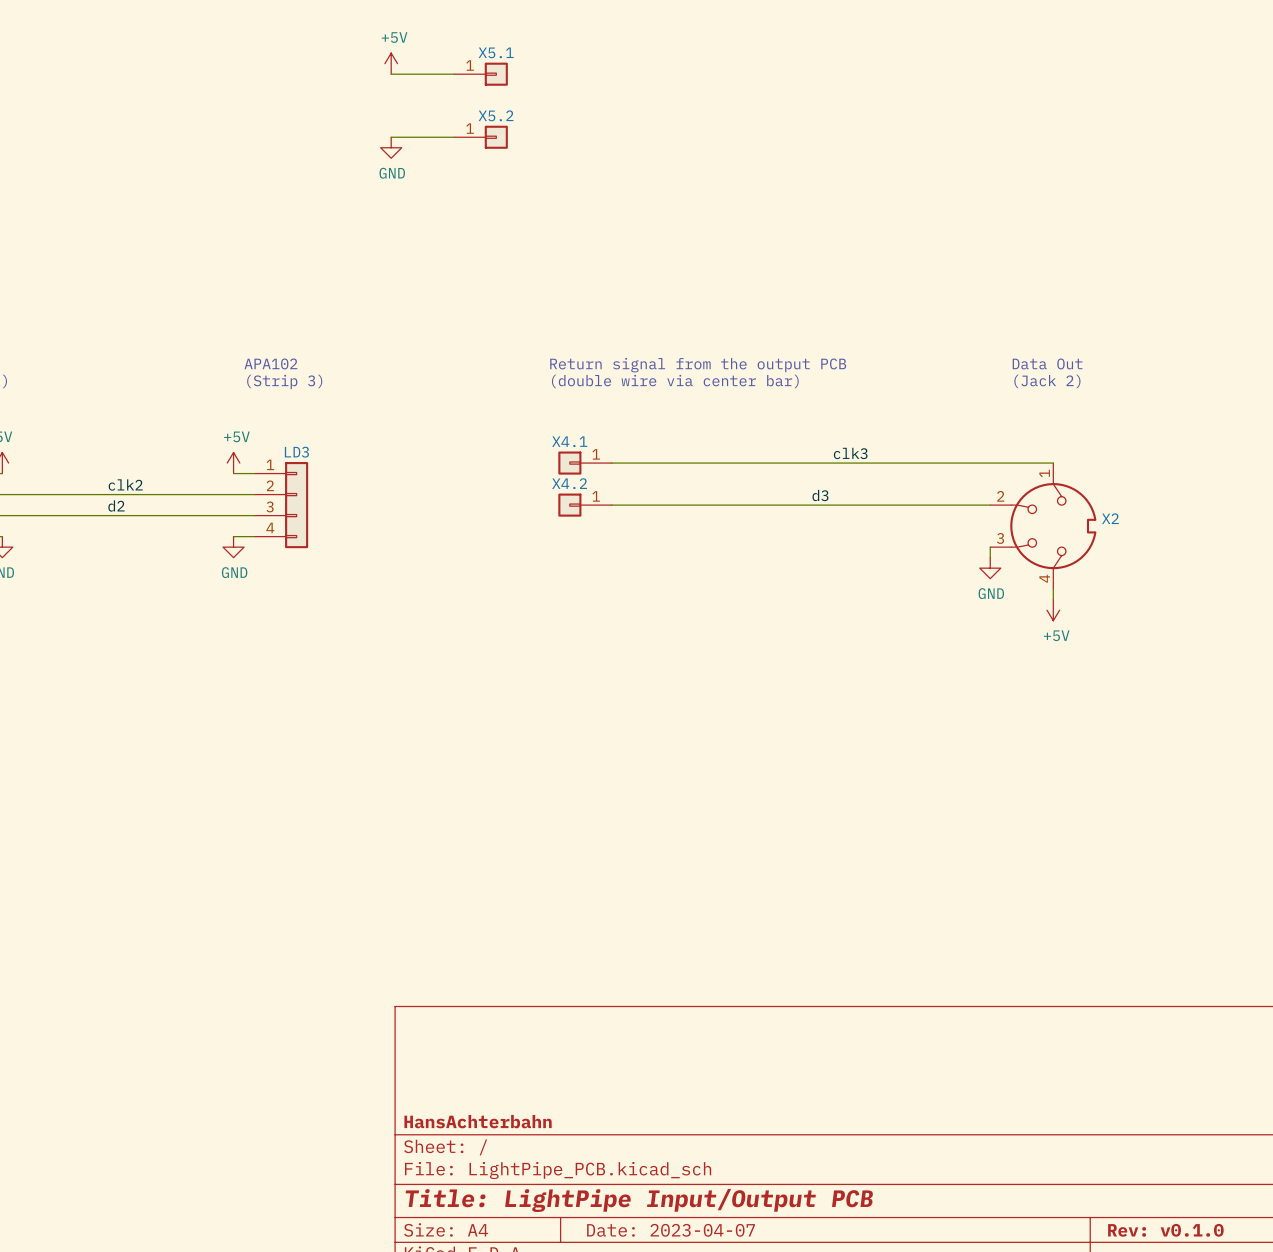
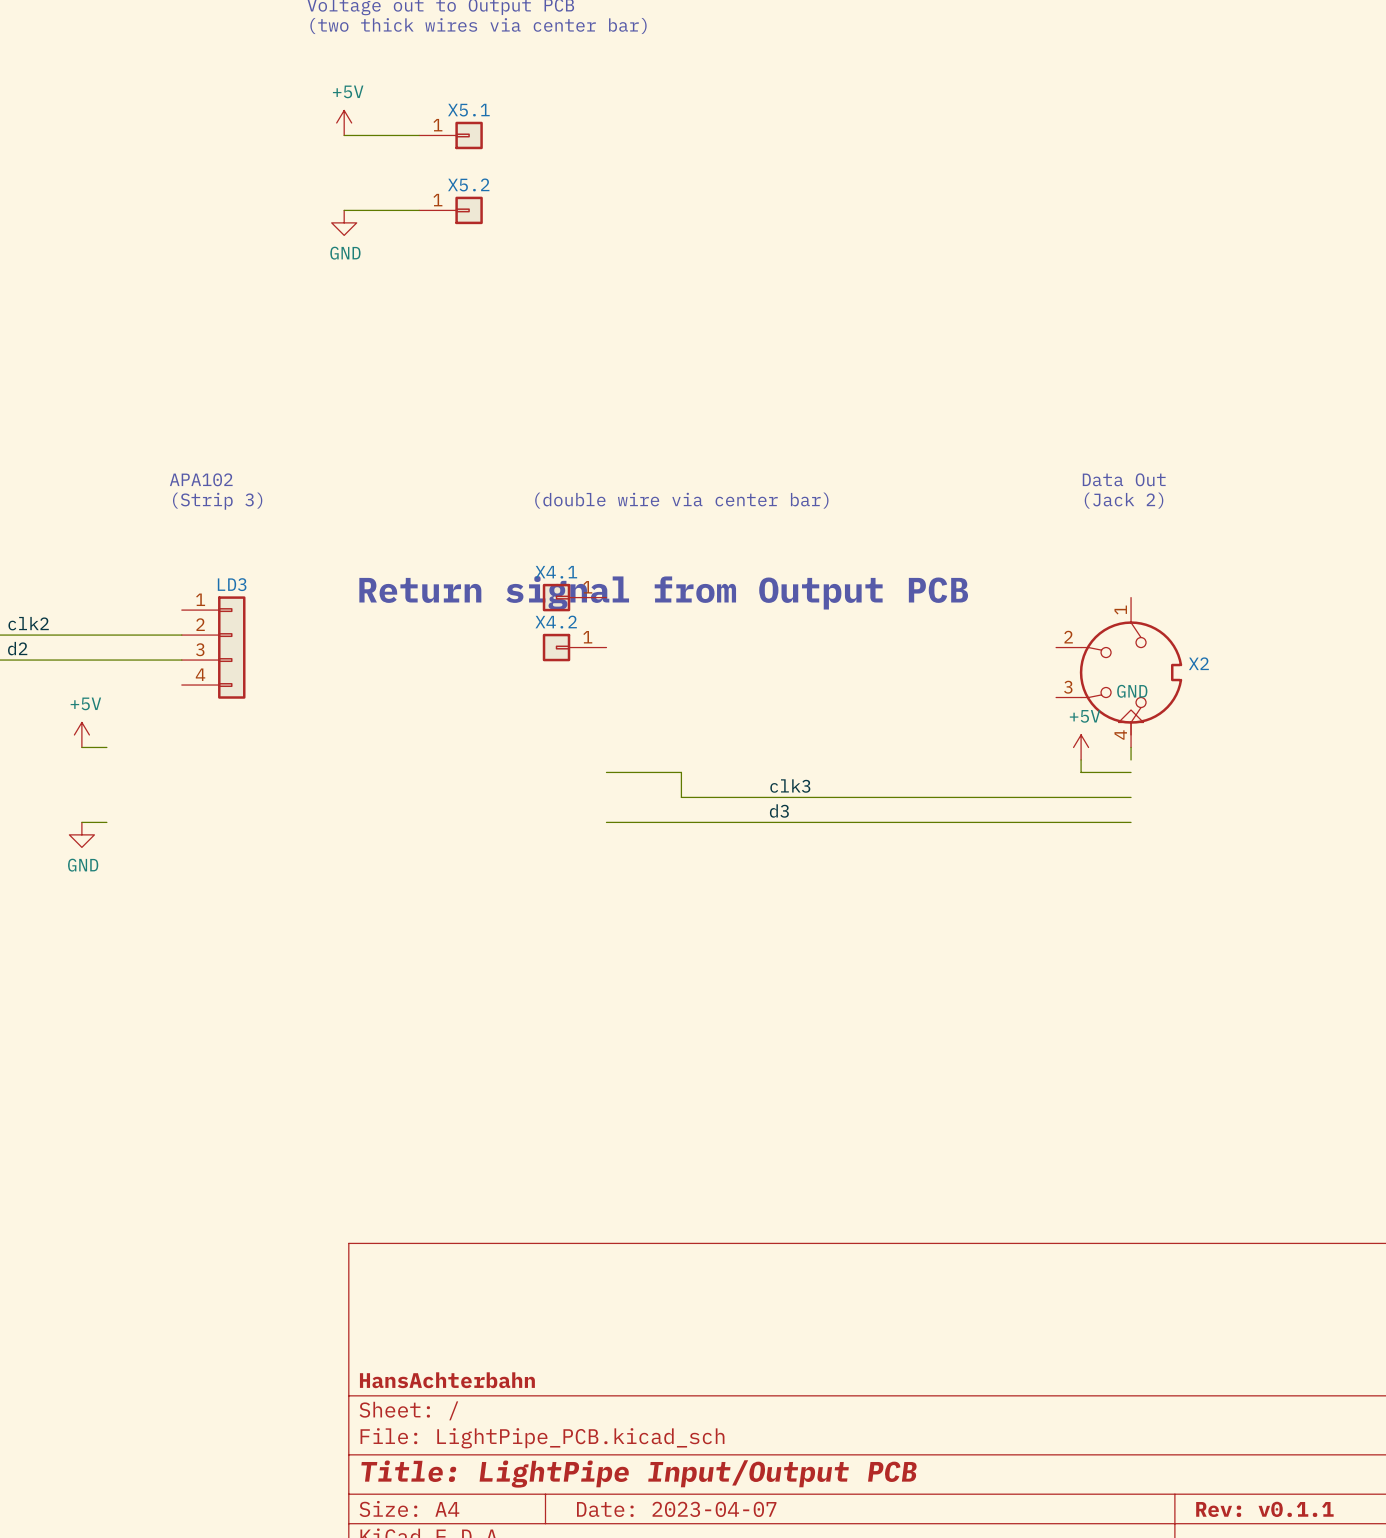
text: Return signal from the output PCB (698, 365) -> none
label position: clk3 (850, 453) -> clk3 (790, 786)
text: none -> Return signal from Output PCB (663, 593)
power symbol position: +5V (233, 463) -> +5V (81, 734)
wire: (611, 463) (1053, 463) -> (606, 822) (1131, 822)
wire: (233, 473) (254, 473) -> (81, 747) (106, 747)
label position: d3 (820, 495) -> d3 (779, 810)
wire: (611, 505) (990, 505) -> none
wire: (233, 536) (254, 536) -> (81, 822) (106, 822)
power symbol position: GND (233, 547) -> GND (81, 834)
wire: (990, 547) (990, 557) -> none
power symbol rotation: 0° (990, 568) -> 180° (1131, 722)
power symbol position: GND (990, 568) -> GND (1131, 722)
wire: none -> (1081, 759) (1081, 772) (1131, 772)
wire: none -> (606, 772) (681, 772) (681, 797) (1131, 797)
power symbol rotation: 0° (1053, 610) -> 180° (1081, 747)
power symbol position: +5V (1053, 610) -> +5V (1081, 747)
title block: Rev: v0.1.0 (1165, 1230) -> Rev: v0.1.1 (1264, 1509)

